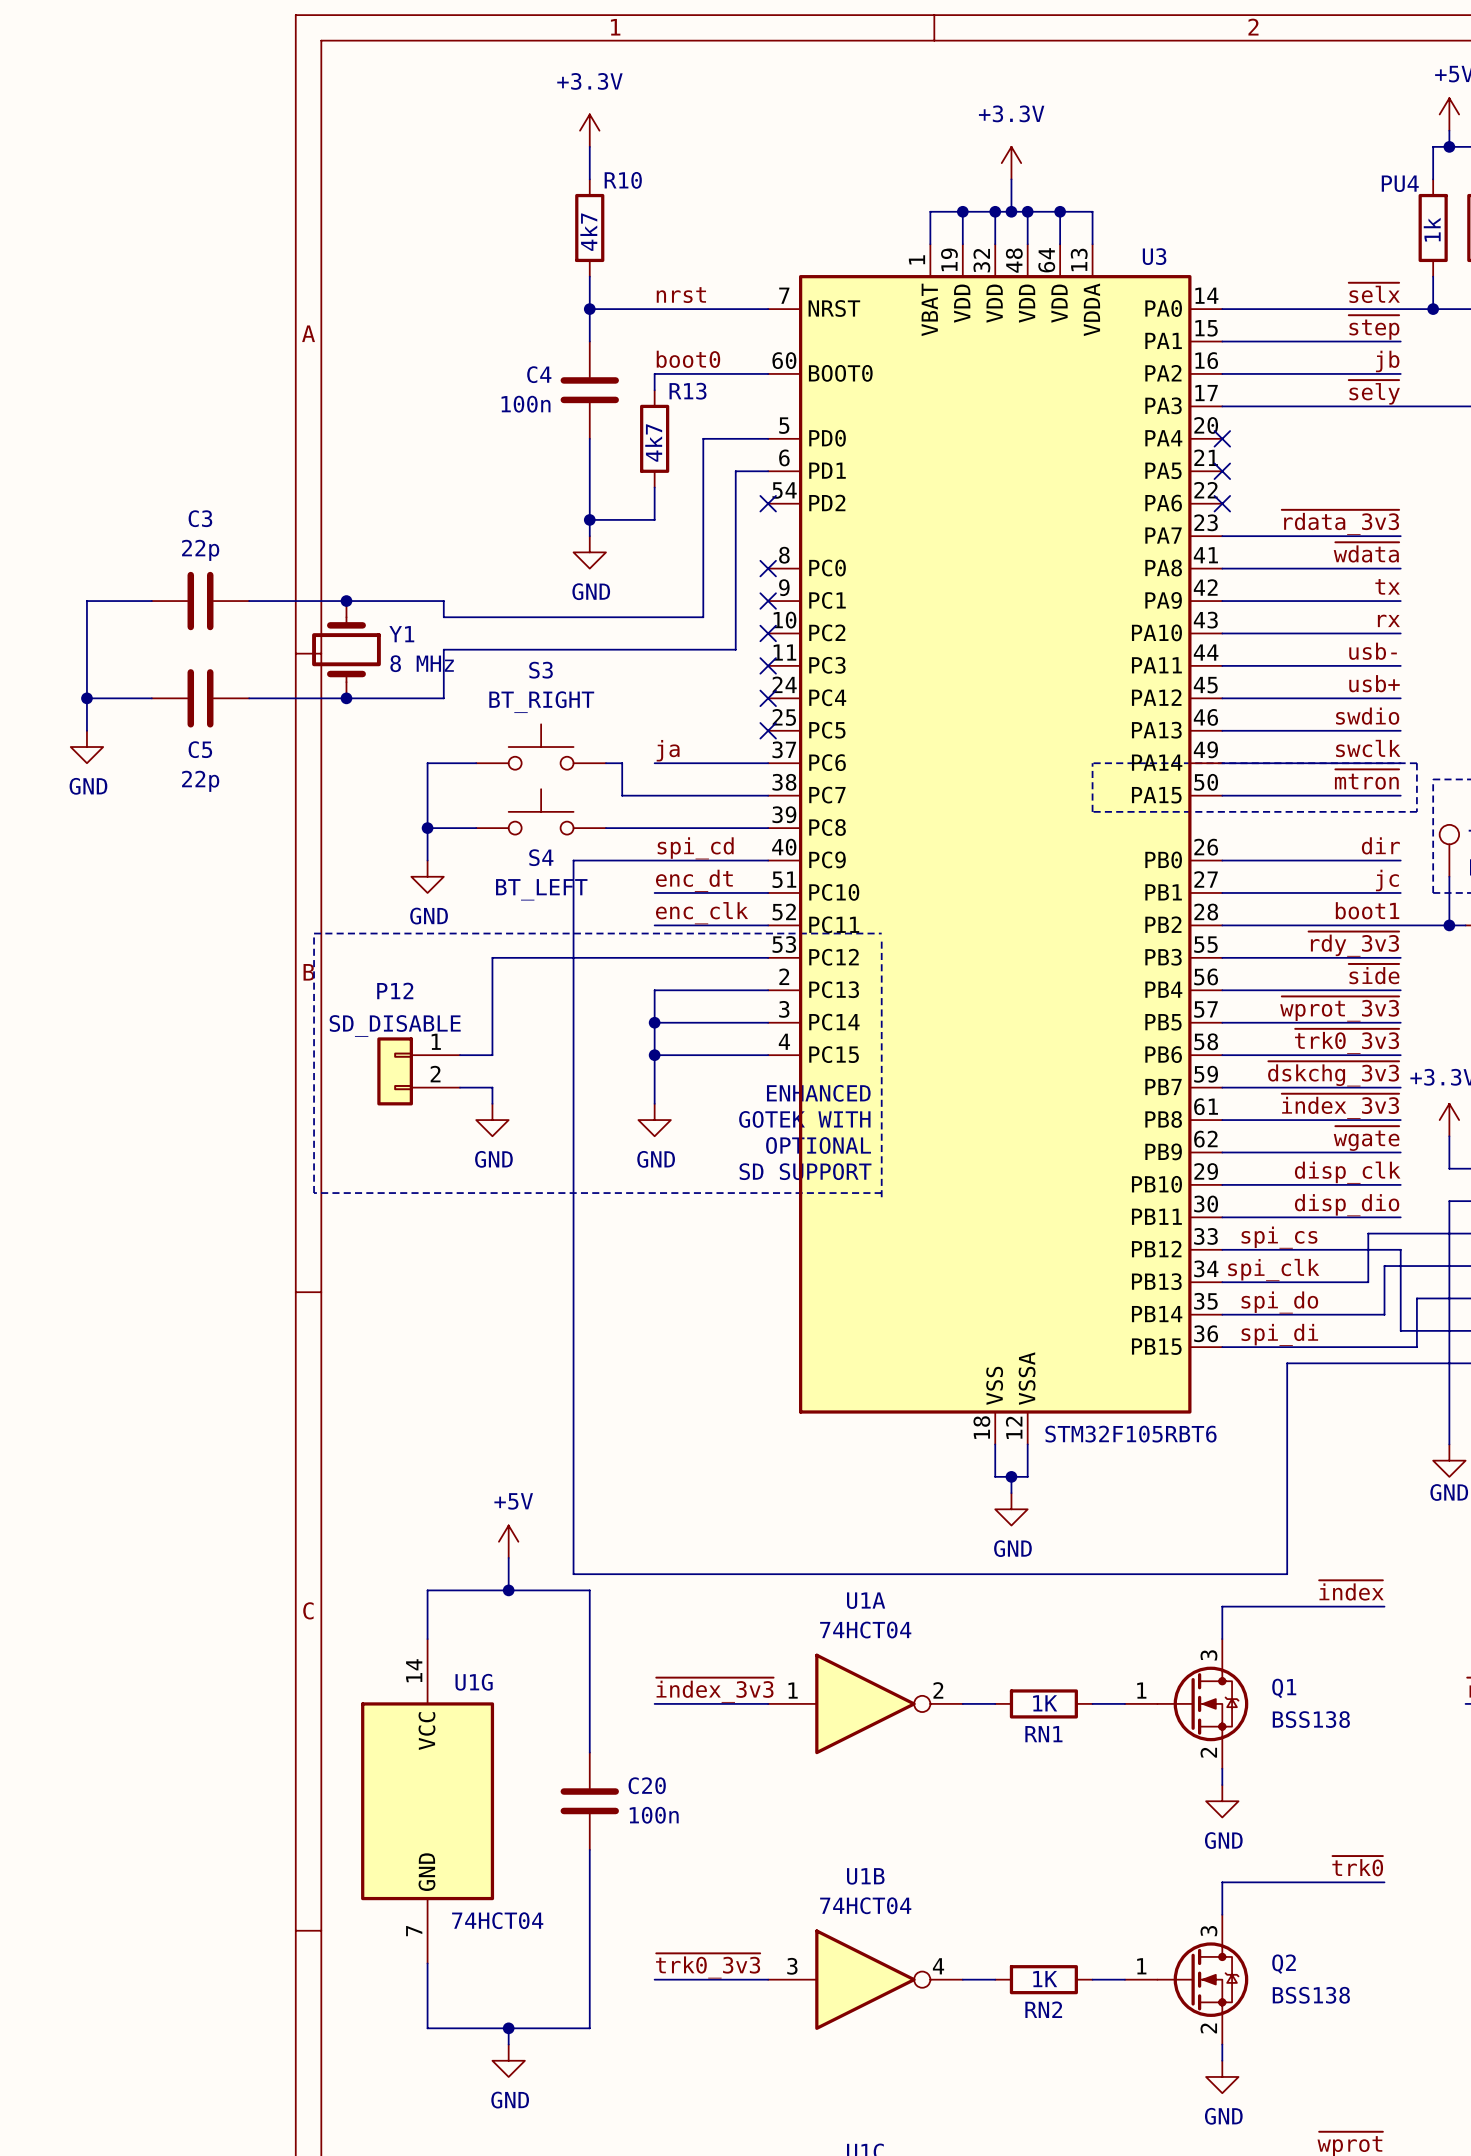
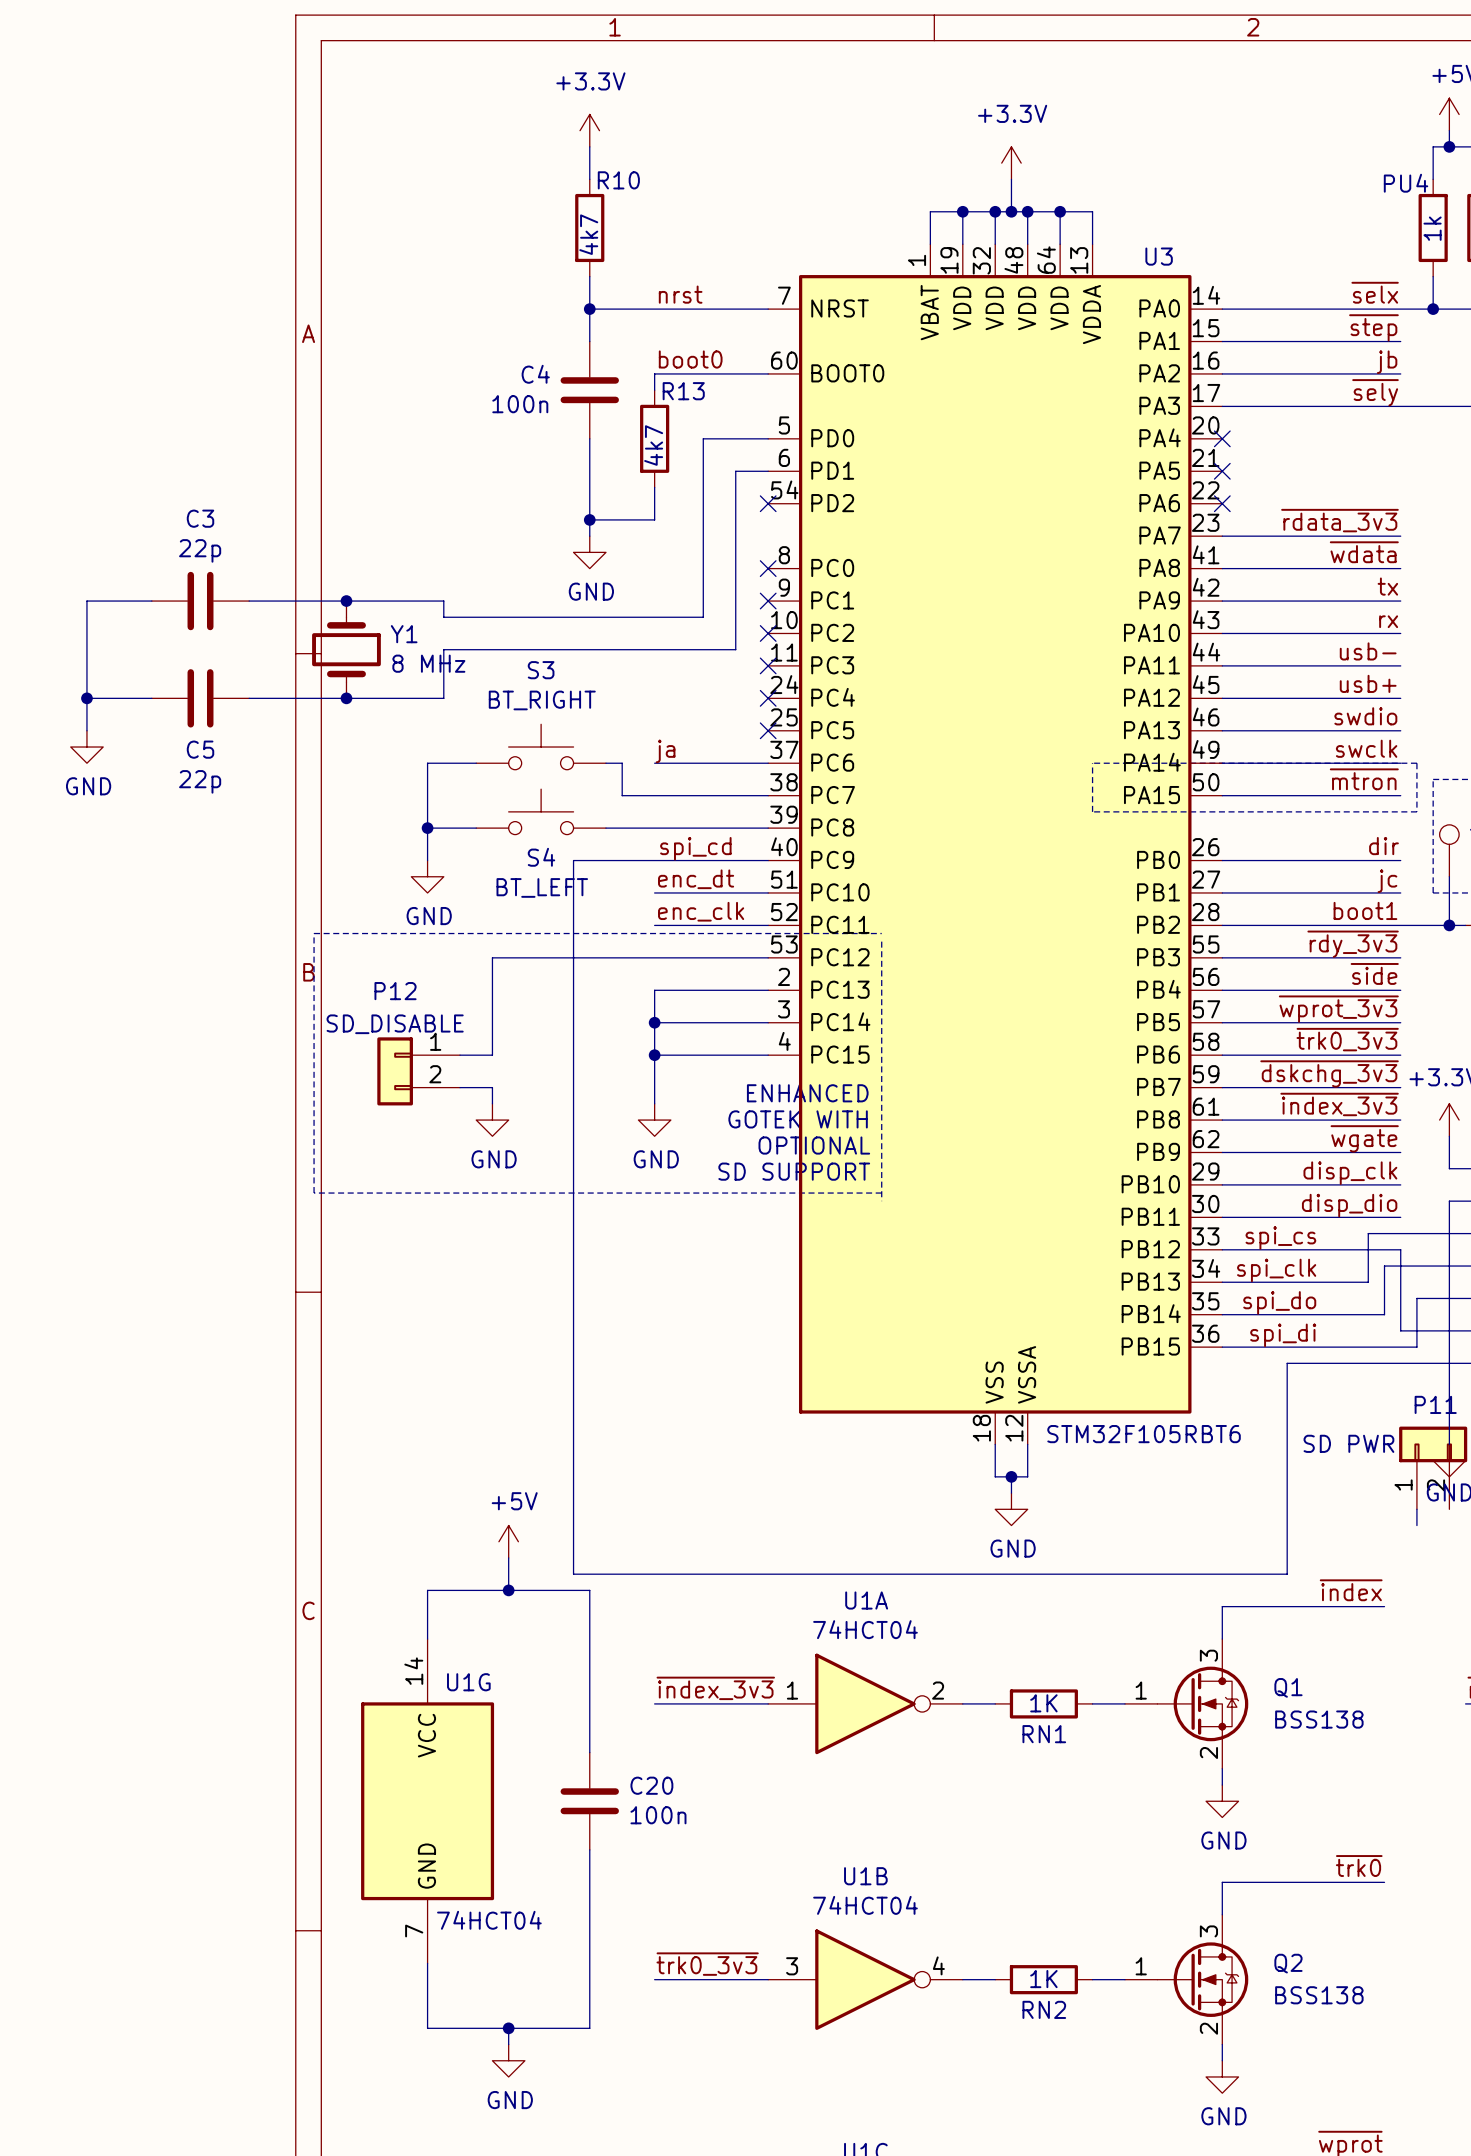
P11: none -> SD PWR (1433, 1467)
wire: none -> (1416, 1509) (1416, 1525)

